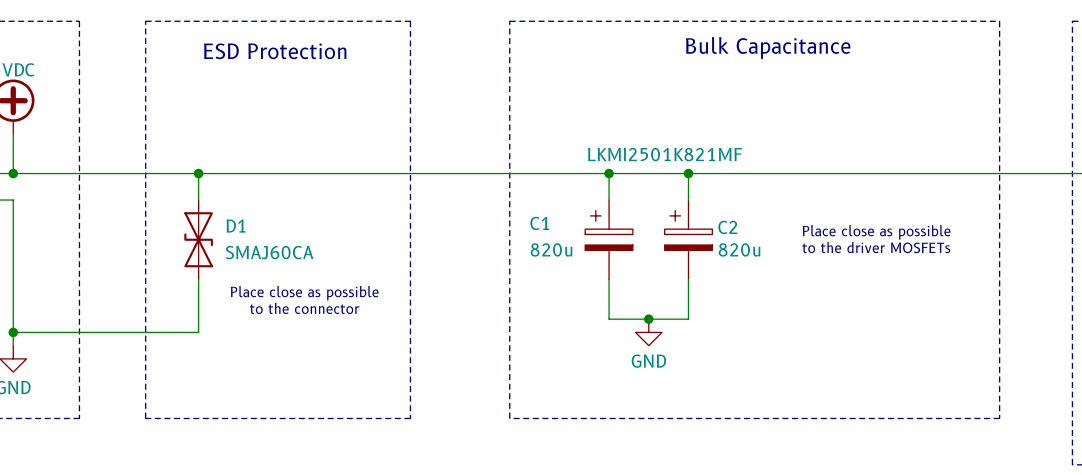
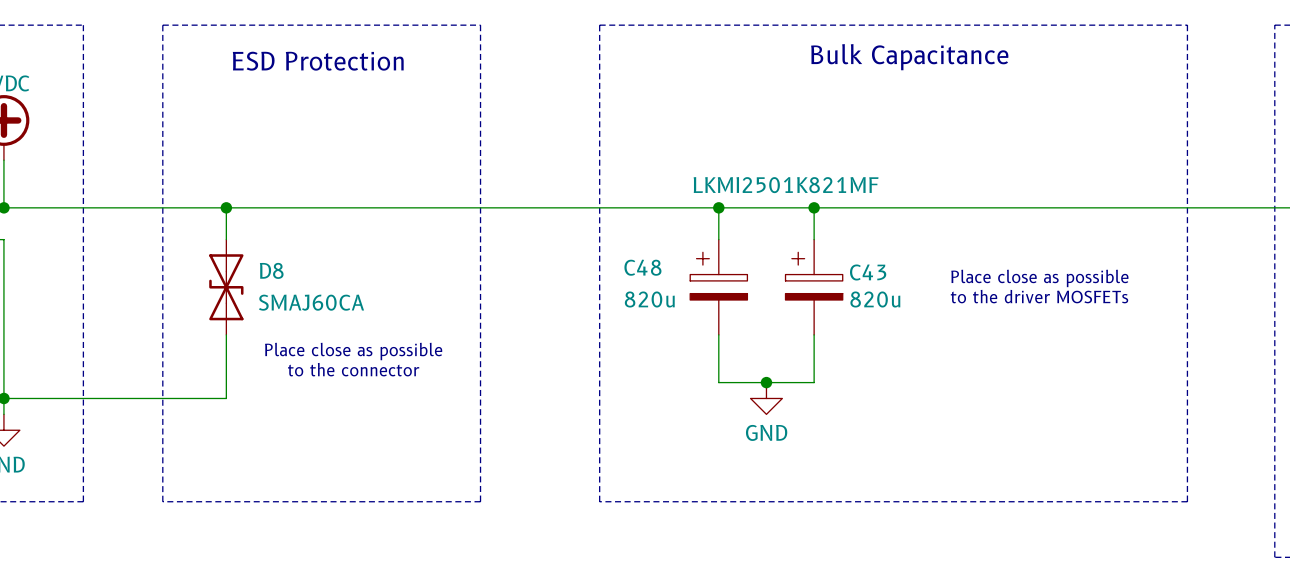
C1 name: C1 (539, 223) -> C48 (642, 267)
D1 name: D1 (236, 226) -> D8 (271, 270)
C2 name: C2 (727, 227) -> C43 (868, 272)

